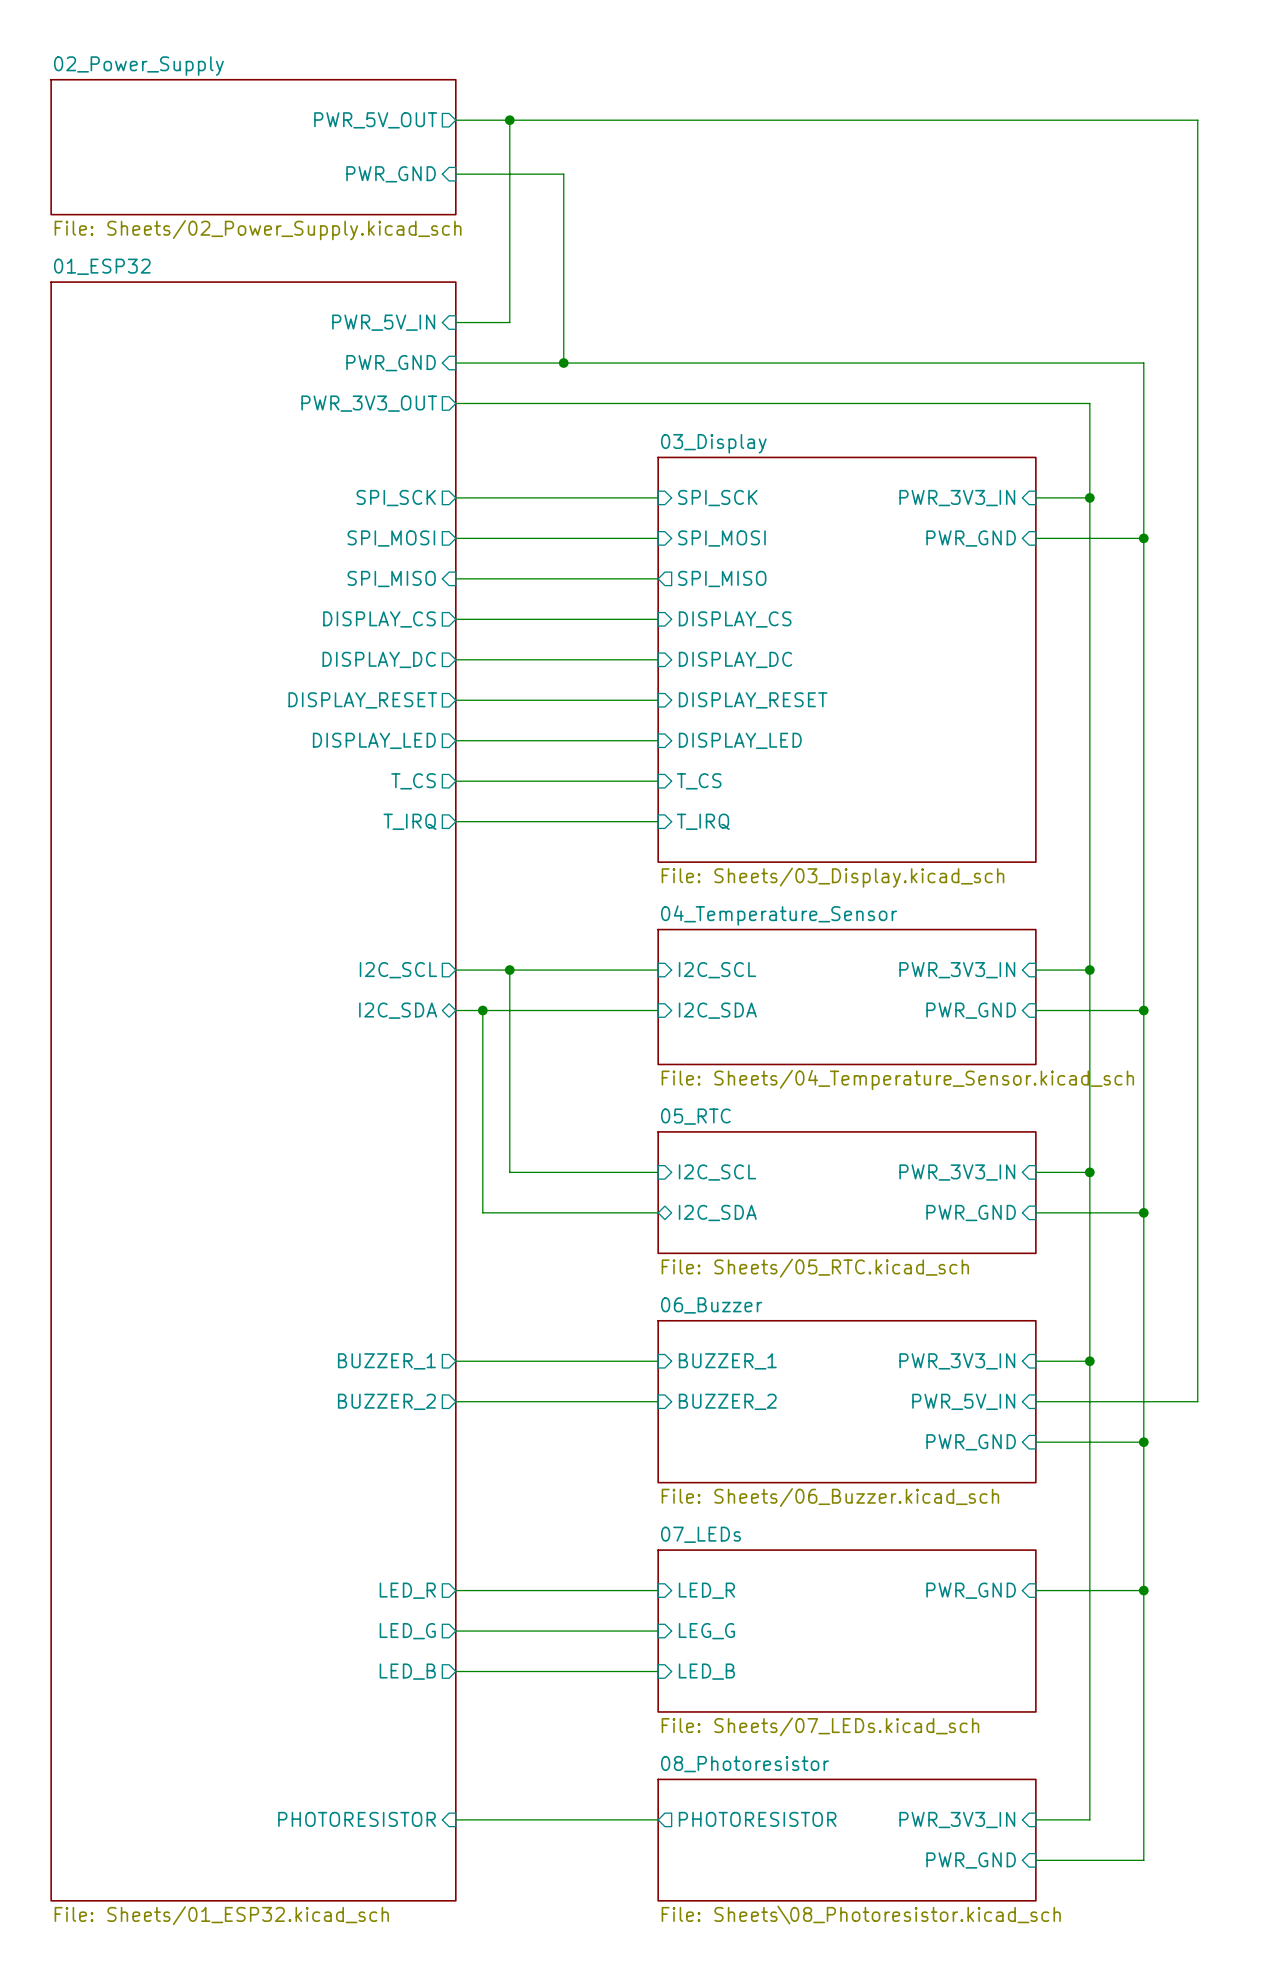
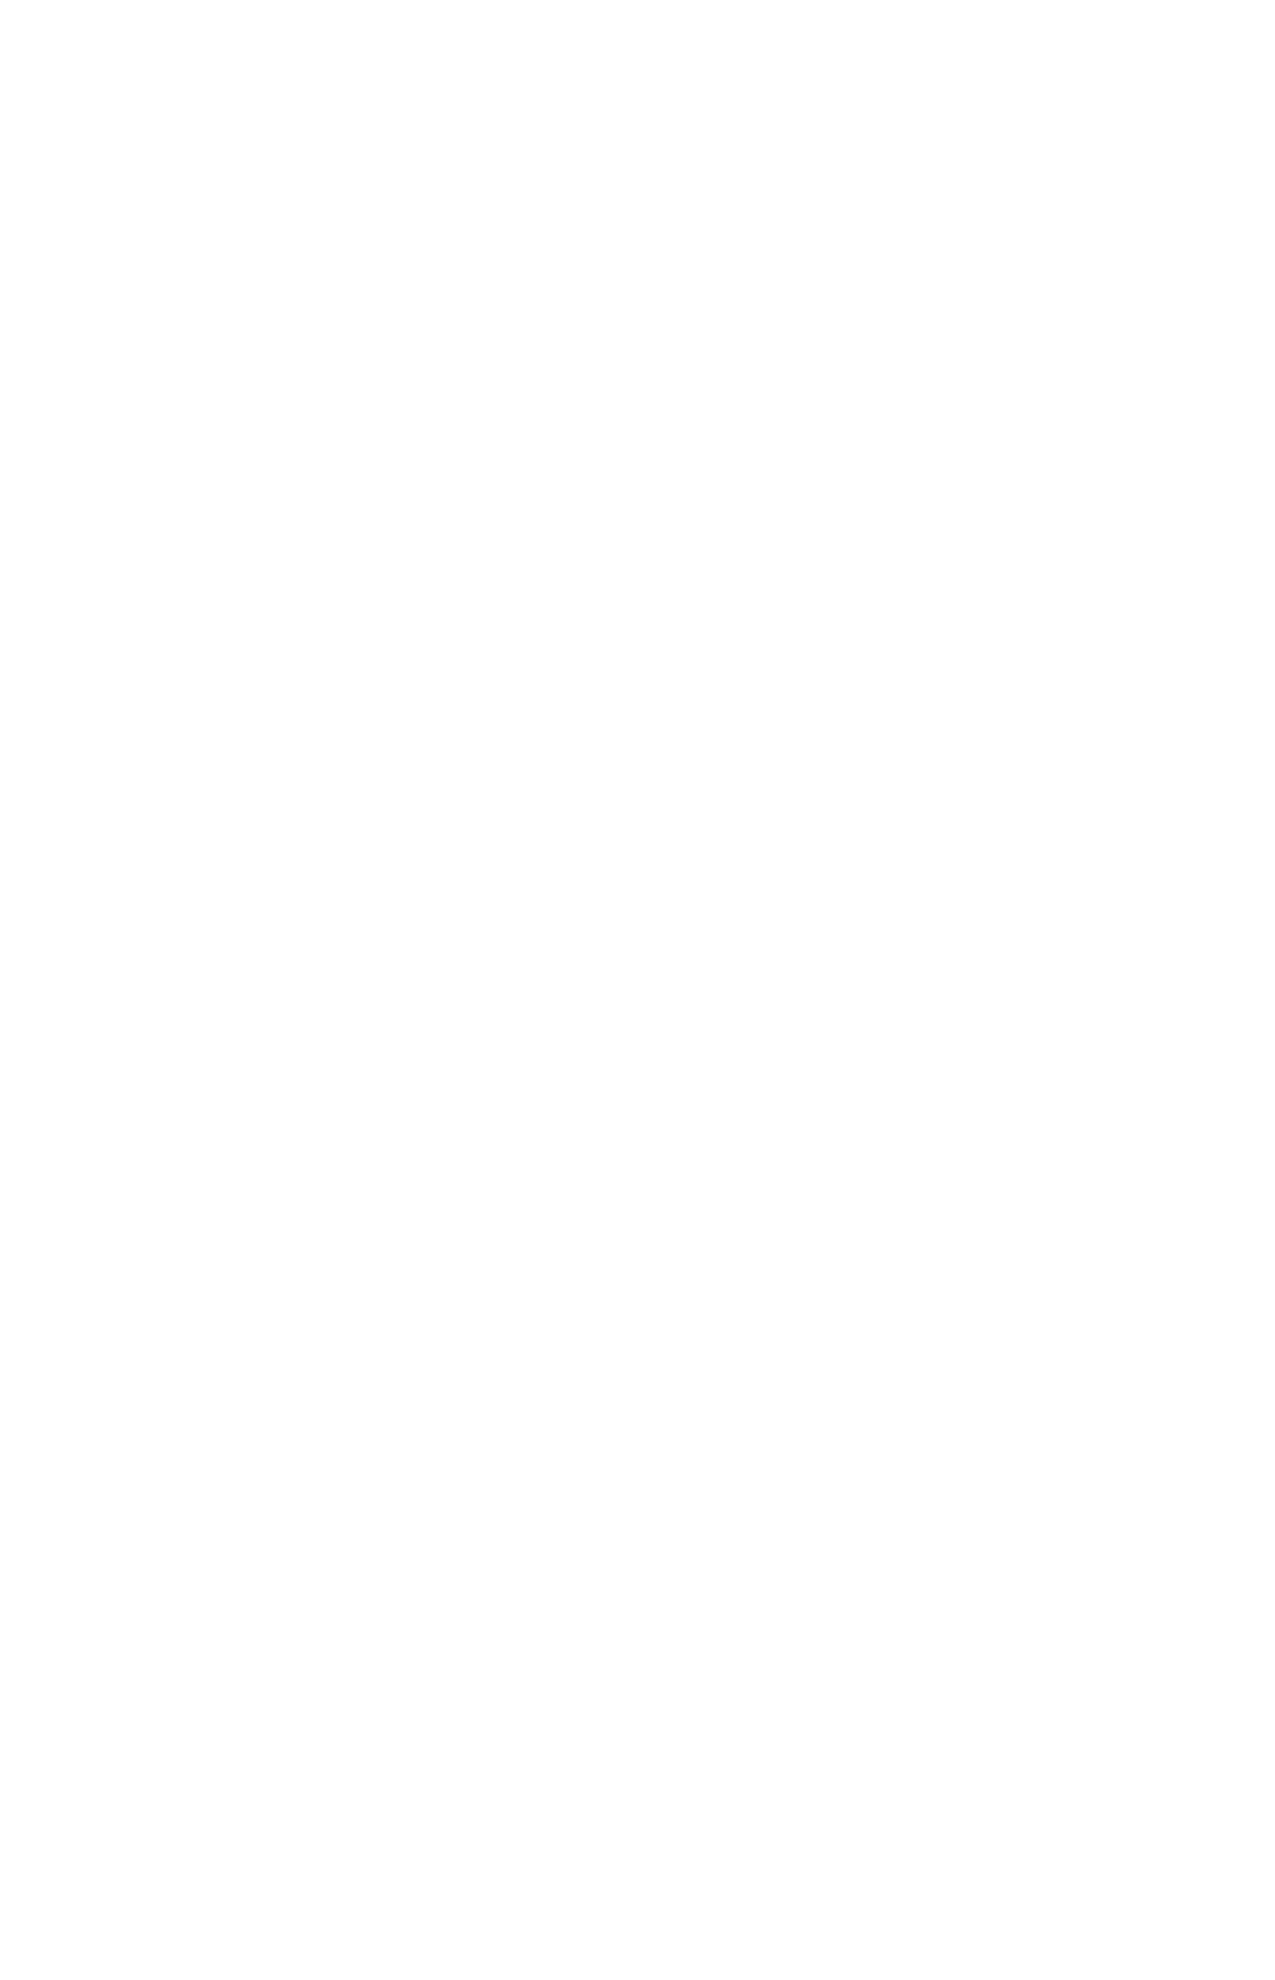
sheet pin: PWR_5V_OUT (375, 120) -> none
wire: (455, 120) (1197, 120) (1197, 1401) (1035, 1401) -> none
wire: (509, 120) (509, 322) (455, 322) -> none
junction: (509, 120) -> none
sheet 02_Power_Supply: File: Sheets/02_Power_Supply.kicad_sch (253, 147) -> none
sheet pin: PWR_GND (391, 174) -> none
wire: (455, 174) (563, 174) (563, 363) -> none
sheet pin: PWR_5V_IN (383, 322) -> none
sheet pin: PWR_GND (391, 363) -> none
wire: (455, 363) (1143, 363) (1143, 1860) (1035, 1860) -> none
junction: (563, 363) -> none
sheet pin: PWR_3V3_OUT (369, 403) -> none
wire: (455, 403) (1089, 403) (1089, 1819) (1035, 1819) -> none
wire: (455, 497) (658, 497) -> none
wire: (1035, 497) (1089, 497) -> none
junction: (1089, 497) -> none
sheet pin: SPI_SCK (396, 498) -> none
sheet pin: SPI_SCK (717, 498) -> none
sheet pin: PWR_3V3_IN (957, 498) -> none
sheet pin: SPI_MOSI (391, 538) -> none
wire: (455, 538) (658, 538) -> none
sheet pin: SPI_MOSI (721, 538) -> none
sheet pin: PWR_GND (971, 538) -> none
wire: (1035, 538) (1143, 538) -> none
junction: (1143, 538) -> none
sheet pin: SPI_MISO (391, 578) -> none
wire: (455, 578) (658, 578) -> none
sheet pin: SPI_MISO (722, 578) -> none
sheet pin: DISPLAY_CS (379, 619) -> none
wire: (455, 619) (658, 619) -> none
sheet pin: DISPLAY_CS (735, 619) -> none
sheet pin: DISPLAY_DC (379, 659) -> none
wire: (455, 659) (658, 659) -> none
sheet pin: DISPLAY_DC (735, 659) -> none
sheet 03_Display: File: Sheets/03_Display.kicad_sch (847, 659) -> none
sheet pin: DISPLAY_RESET (362, 700) -> none
wire: (455, 700) (658, 700) -> none
sheet pin: DISPLAY_RESET (753, 700) -> none
sheet pin: DISPLAY_LED (374, 740) -> none
wire: (455, 740) (658, 740) -> none
sheet pin: DISPLAY_LED (740, 740) -> none
sheet pin: T_CS (413, 781) -> none
wire: (455, 781) (658, 781) -> none
sheet pin: T_CS (699, 781) -> none
sheet pin: T_IRQ (410, 821) -> none
wire: (455, 821) (658, 821) -> none
sheet pin: T_IRQ (703, 821) -> none
sheet pin: I2C_SCL (398, 970) -> none
wire: (455, 970) (658, 970) -> none
wire: (509, 970) (509, 1172) (658, 1172) -> none
junction: (509, 970) -> none
sheet pin: I2C_SCL (717, 970) -> none
sheet pin: PWR_3V3_IN (957, 970) -> none
wire: (1035, 970) (1089, 970) -> none
junction: (1089, 970) -> none
sheet 04_Temperature_Sensor: File: Sheets/04_Temperature_Sensor.kicad_sch (847, 997) -> none
sheet pin: I2C_SDA (398, 1010) -> none
wire: (455, 1010) (658, 1010) -> none
wire: (482, 1010) (482, 1212) (658, 1212) -> none
junction: (482, 1010) -> none
sheet pin: I2C_SDA (717, 1010) -> none
sheet pin: PWR_GND (971, 1010) -> none
wire: (1035, 1010) (1143, 1010) -> none
junction: (1143, 1010) -> none
sheet 01_ESP32: File: Sheets/01_ESP32.kicad_sch (253, 1091) -> none
sheet pin: I2C_SCL (717, 1172) -> none
sheet pin: PWR_3V3_IN (957, 1172) -> none
wire: (1035, 1172) (1089, 1172) -> none
junction: (1089, 1172) -> none
sheet 05_RTC: File: Sheets/05_RTC.kicad_sch (847, 1192) -> none
sheet pin: I2C_SDA (717, 1212) -> none
sheet pin: PWR_GND (971, 1212) -> none
wire: (1035, 1212) (1143, 1212) -> none
junction: (1143, 1212) -> none
sheet pin: BUZZER_1 (386, 1361) -> none
wire: (455, 1361) (658, 1361) -> none
sheet pin: BUZZER_1 (727, 1361) -> none
sheet pin: PWR_3V3_IN (957, 1361) -> none
wire: (1035, 1361) (1089, 1361) -> none
junction: (1089, 1361) -> none
sheet pin: BUZZER_2 (386, 1401) -> none
wire: (455, 1401) (658, 1401) -> none
sheet pin: BUZZER_2 (727, 1401) -> none
sheet 06_Buzzer: File: Sheets/06_Buzzer.kicad_sch (847, 1401) -> none
sheet pin: PWR_5V_IN (963, 1401) -> none
sheet pin: PWR_GND (971, 1442) -> none
wire: (1035, 1442) (1143, 1442) -> none
junction: (1143, 1442) -> none
sheet pin: LED_R (407, 1590) -> none
wire: (455, 1590) (658, 1590) -> none
sheet pin: LED_R (706, 1590) -> none
sheet pin: PWR_GND (971, 1590) -> none
wire: (1035, 1590) (1143, 1590) -> none
junction: (1143, 1590) -> none
sheet pin: LED_G (407, 1631) -> none
wire: (455, 1631) (658, 1631) -> none
sheet pin: LEG_G (706, 1631) -> none
sheet 07_LEDs: File: Sheets/07_LEDs.kicad_sch (847, 1631) -> none
sheet pin: LED_B (407, 1671) -> none
wire: (455, 1671) (658, 1671) -> none
sheet pin: LED_B (706, 1671) -> none
sheet pin: PHOTORESISTOR (357, 1819) -> none
wire: (455, 1819) (658, 1819) -> none
sheet pin: PHOTORESISTOR (757, 1819) -> none
sheet pin: PWR_3V3_IN (957, 1820) -> none
sheet 08_Photoresistor: File: Sheets\08_Photoresistor.kicad_sch (847, 1840) -> none
sheet pin: PWR_GND (971, 1860) -> none

